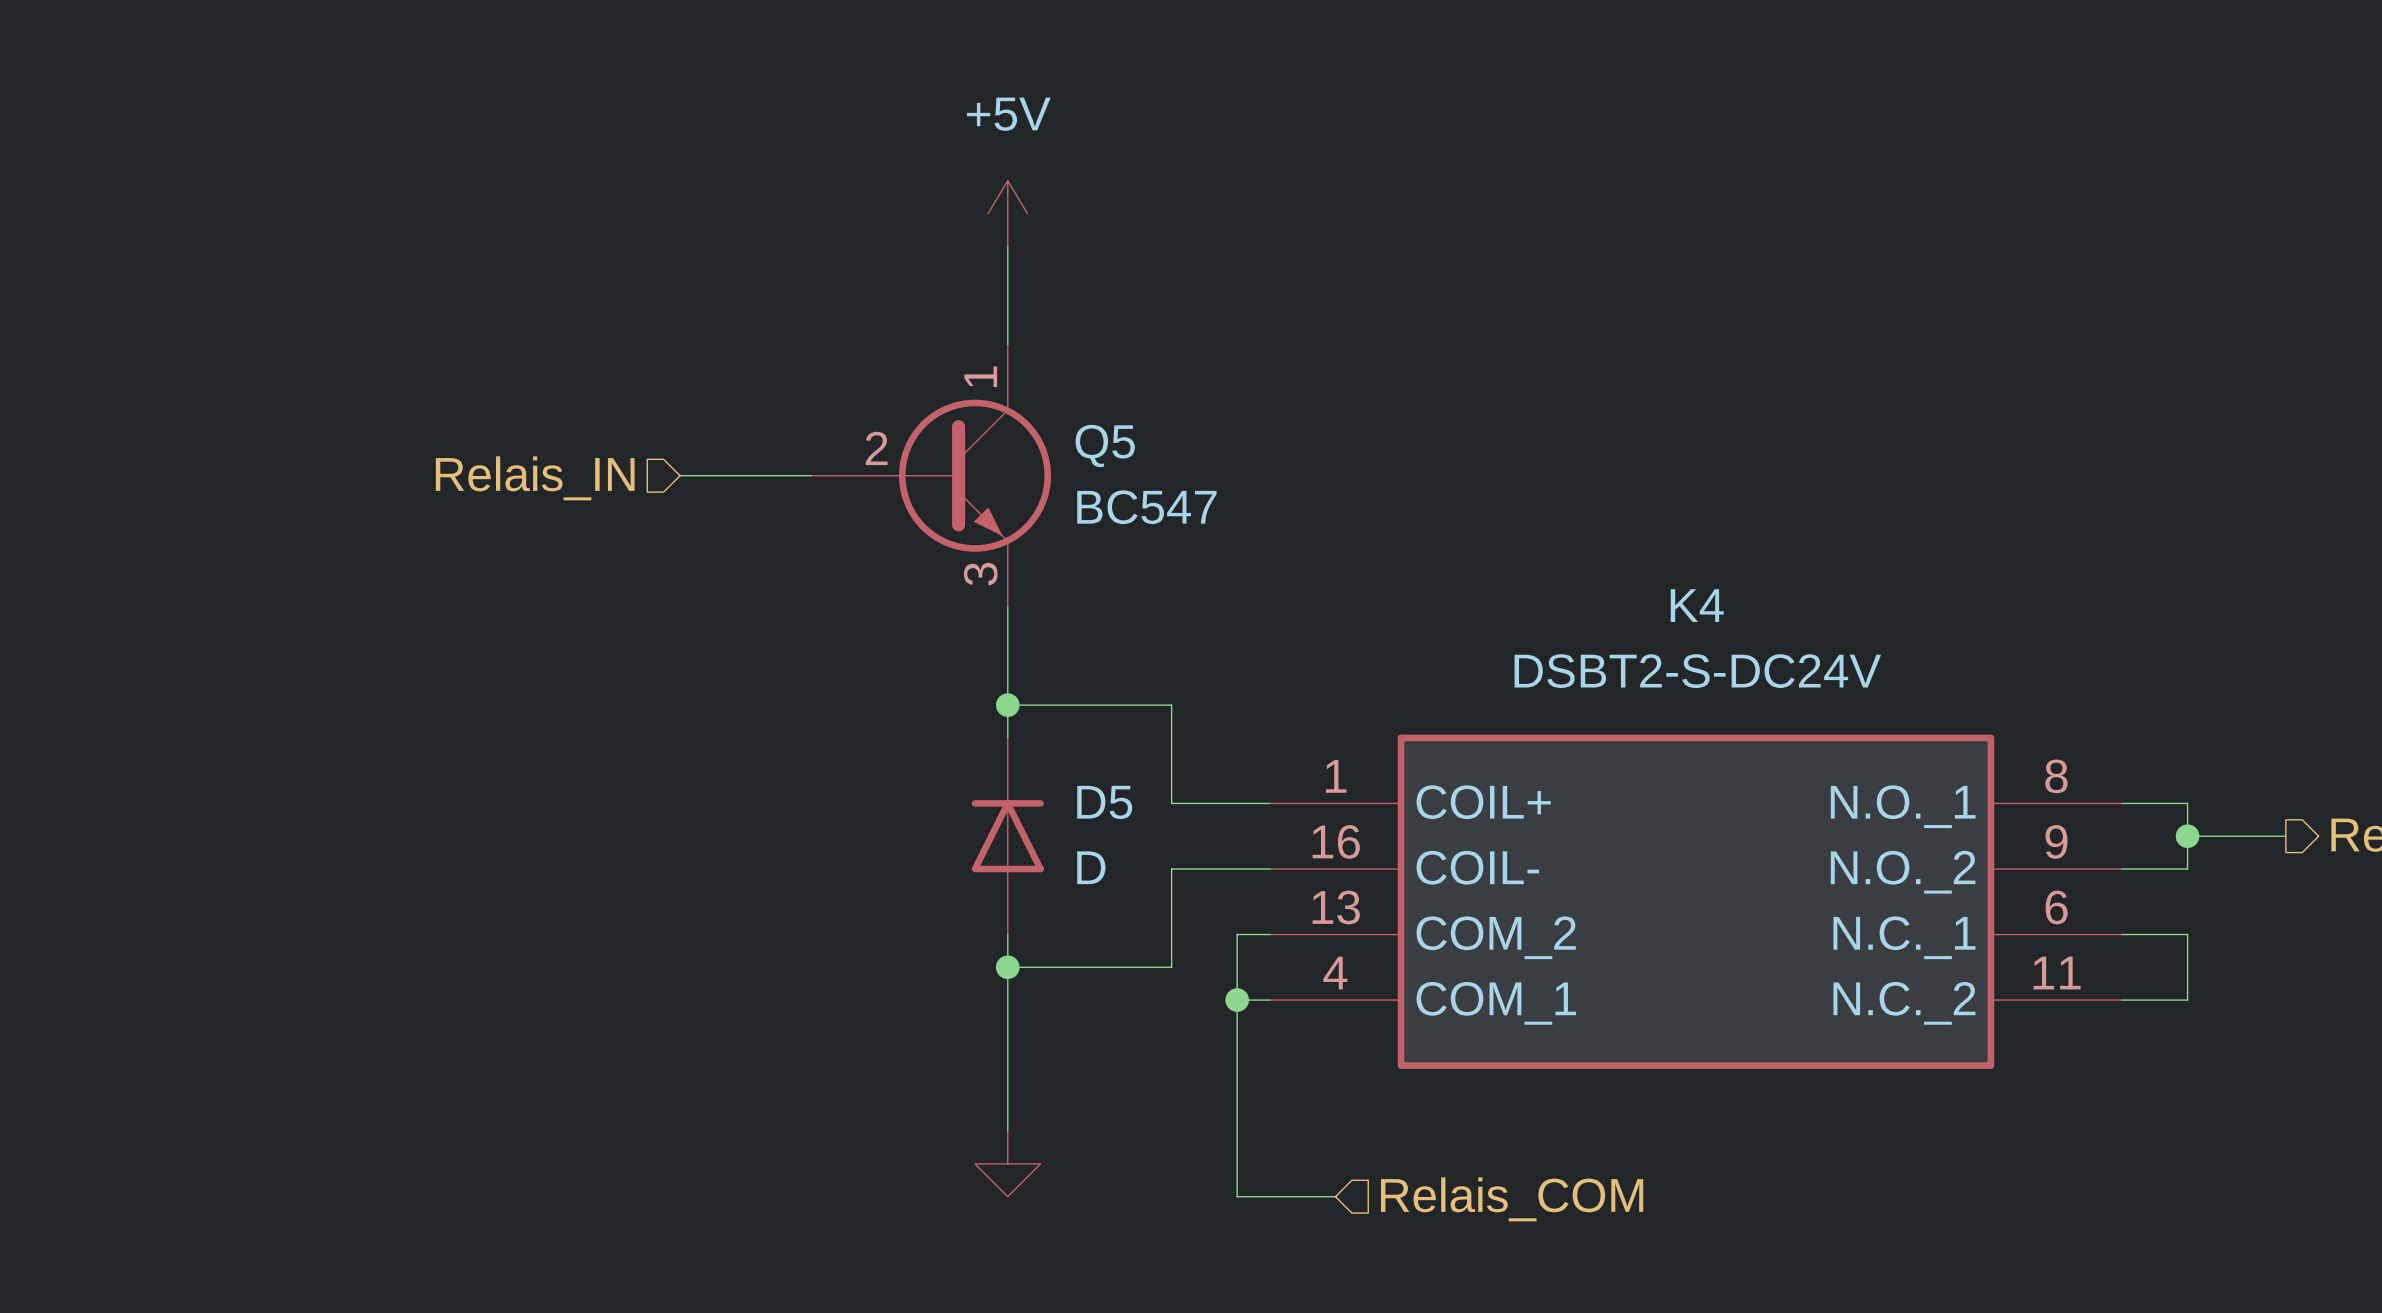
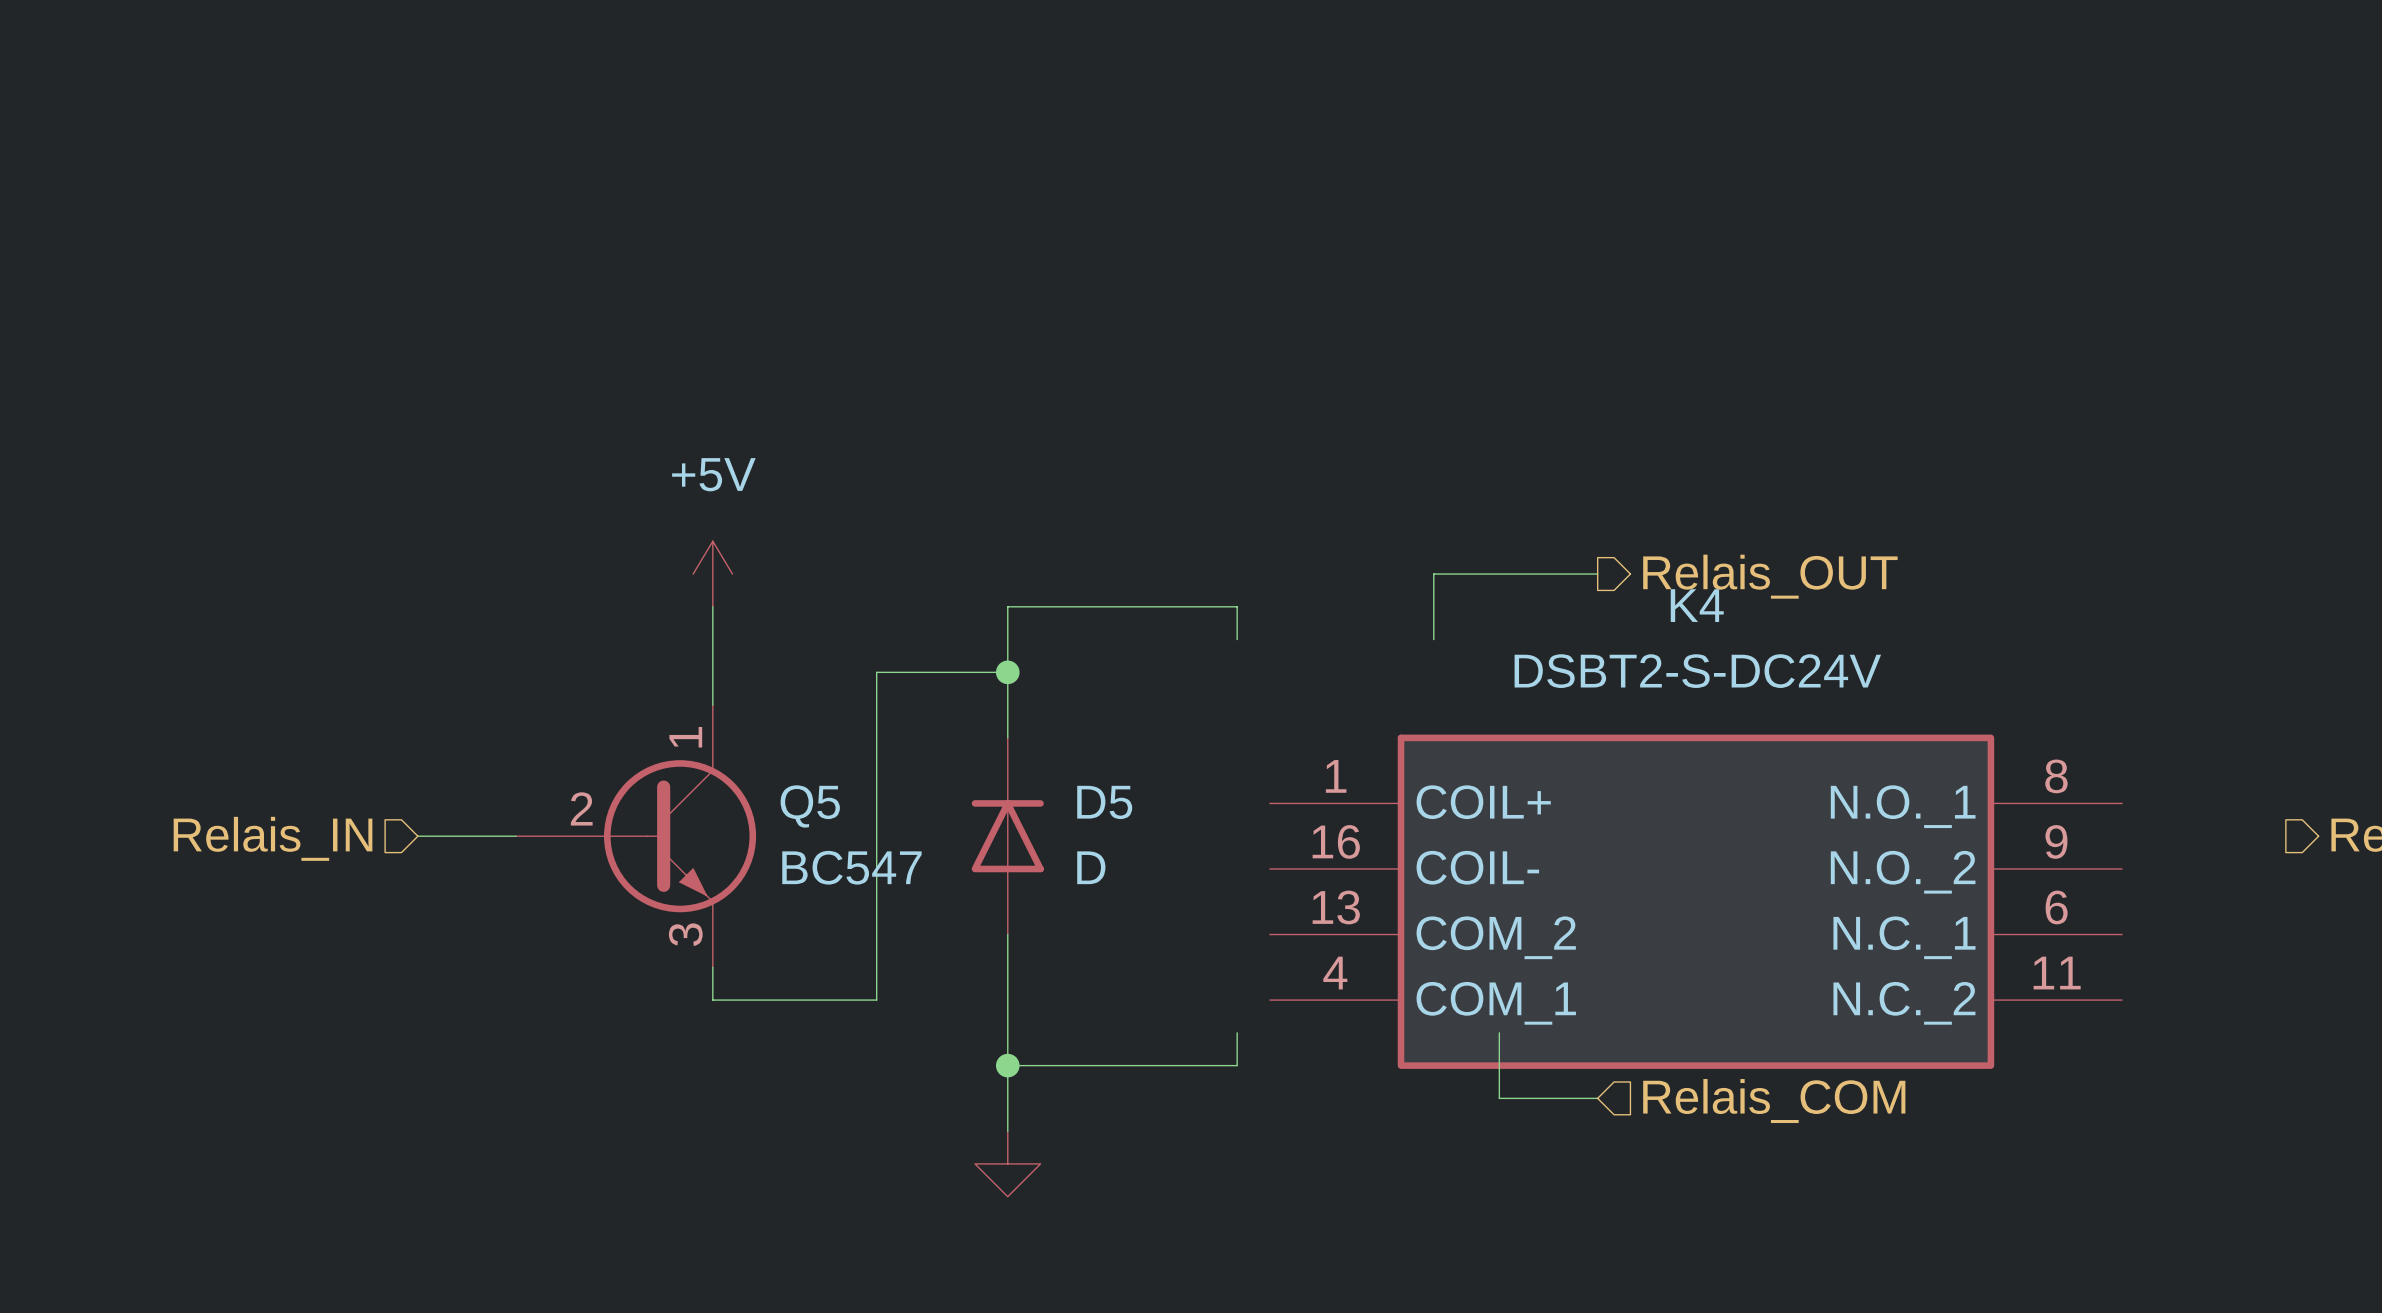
power symbol position: +5V (1007, 213) -> +5V (712, 574)
wire: (1007, 246) (1007, 344) -> (712, 606) (712, 705)
wire: (680, 475) (811, 475) -> none
Q5 position: (931, 475) -> (636, 836)
hierarchical label position: Relais_IN (535, 478) -> Relais_IN (273, 838)
wire: none -> (1597, 574) (1433, 574) (1433, 639)
hierarchical label: none -> Relais_OUT (1770, 576)
wire: none -> (1007, 606) (1237, 606) (1237, 639)
wire: none -> (1007, 672) (876, 672) (876, 1000) (712, 1000) (712, 967)
wire: (1007, 705) (1171, 705) (1171, 803) (1269, 803) -> none
junction position: (1007, 705) -> (1007, 672)
wire: (2122, 803) (2187, 803) (2187, 868) (2122, 868) -> none
wire: none -> (417, 836) (516, 836)
wire: (2187, 836) (2285, 836) -> none
junction: (2187, 836) -> none
wire: (1269, 868) (1171, 868) (1171, 967) (1007, 967) -> none
wire: (1269, 934) (1237, 934) (1237, 1032) -> none
wire: (2122, 934) (2187, 934) (2187, 1000) (2122, 1000) -> none
junction position: (1007, 967) -> (1007, 1065)
wire: (1237, 1000) (1269, 1000) -> none
junction: (1237, 1000) -> none
wire: none -> (1499, 1032) (1499, 1098) (1597, 1098)
wire: (1237, 1065) (1237, 1196) (1335, 1196) -> (1237, 1065) (1007, 1065)
hierarchical label position: Relais_COM (1512, 1199) -> Relais_COM (1774, 1101)

